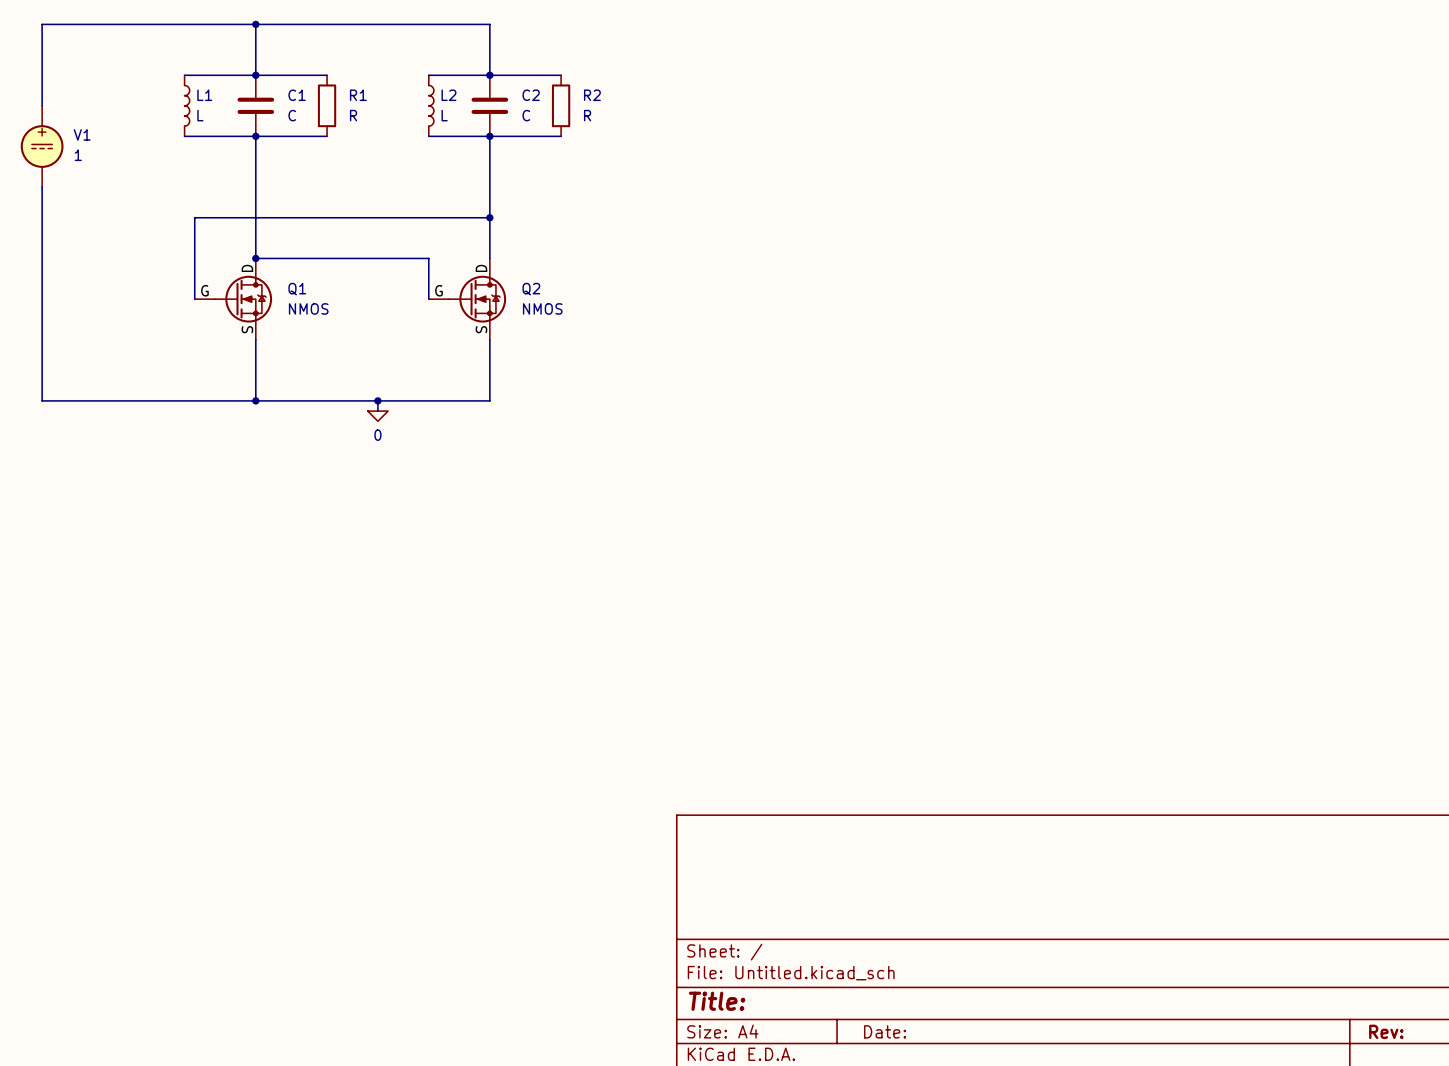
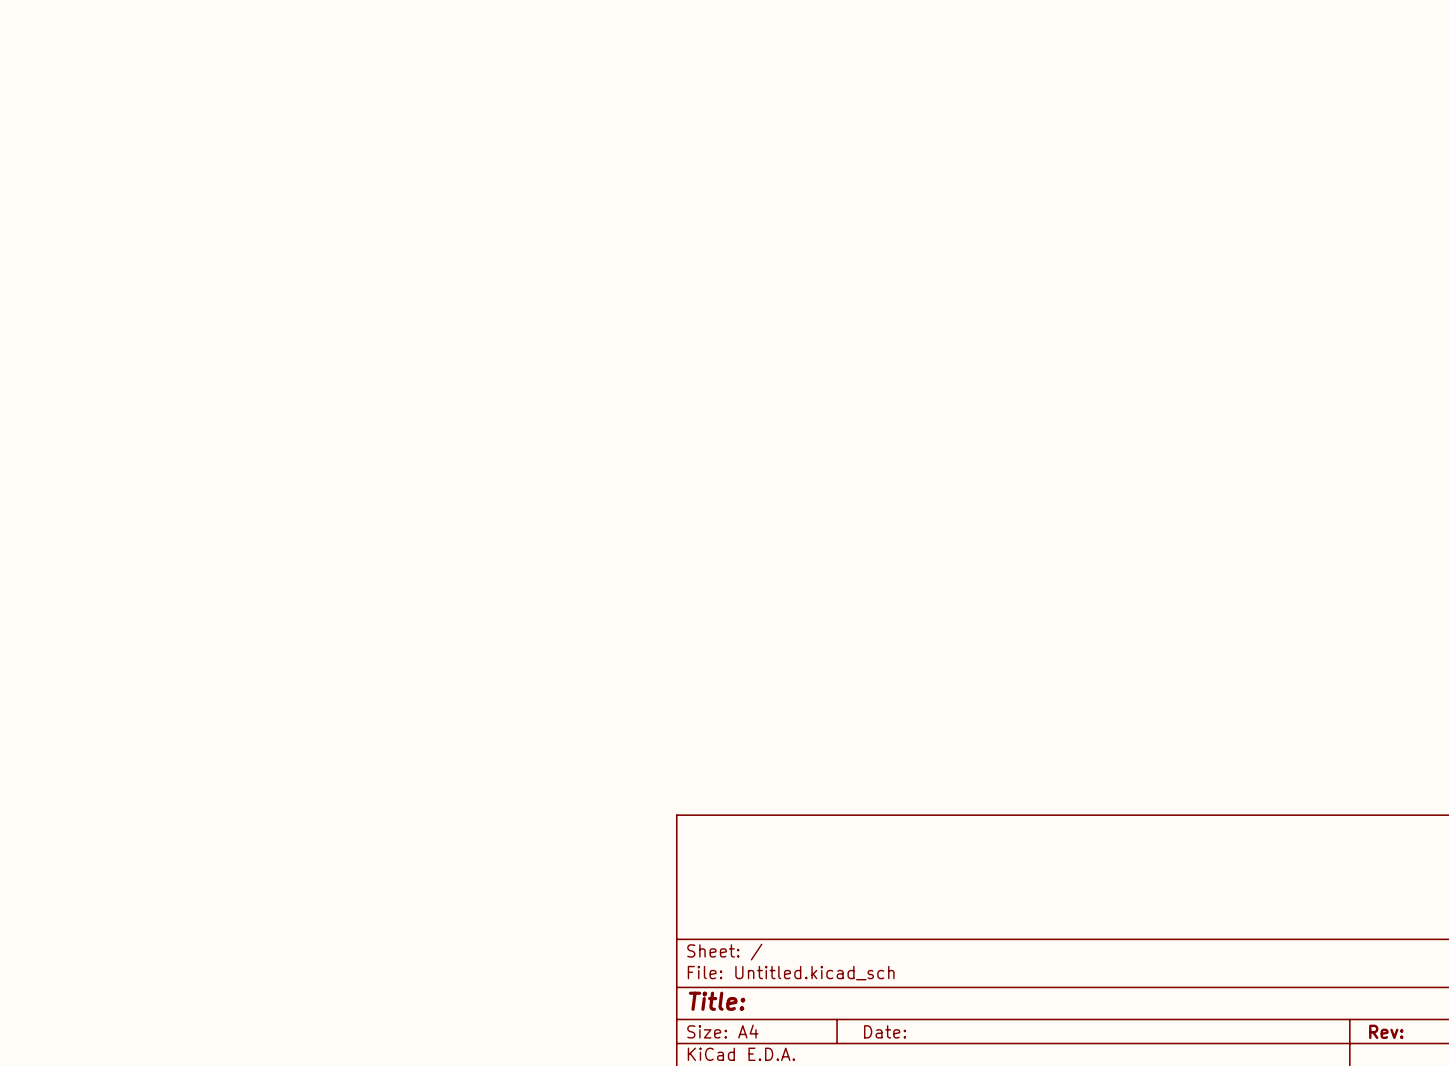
wire: (255, 24) (255, 75) -> none
junction: (255, 24) -> none
wire: (184, 75) (327, 75) -> none
junction: (255, 75) -> none
wire: (428, 75) (561, 75) -> none
wire: (489, 75) (489, 24) (42, 24) (42, 105) -> none
junction: (489, 75) -> none
L1: L (187, 105) -> none
C1: C (255, 105) -> none
R1: R (327, 105) -> none
L2: L (431, 105) -> none
C2: C (489, 105) -> none
R2: R (561, 105) -> none
wire: (184, 136) (327, 136) -> none
wire: (255, 136) (255, 258) (428, 258) (428, 299) -> none
junction: (255, 136) -> none
wire: (428, 136) (561, 136) -> none
wire: (489, 136) (489, 258) -> none
junction: (489, 136) -> none
V1: 1 (42, 146) -> none
wire: (42, 187) (42, 400) (489, 400) (489, 339) -> none
wire: (489, 217) (194, 217) (194, 299) -> none
junction: (489, 217) -> none
junction: (255, 258) -> none
Q1: NMOS (233, 299) -> none
Q2: NMOS (467, 299) -> none
wire: (255, 339) (255, 400) -> none
junction: (255, 400) -> none
wire: (377, 400) (377, 411) -> none
junction: (377, 400) -> none
power symbol: 0 (377, 416) -> none

